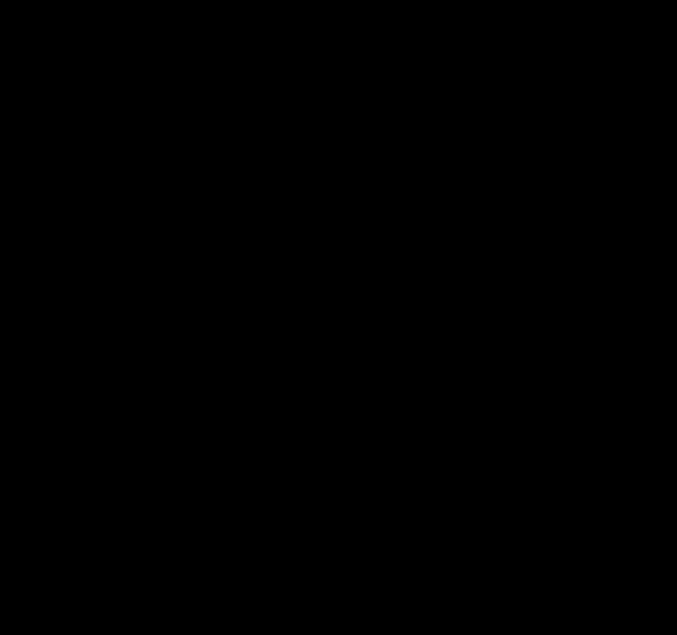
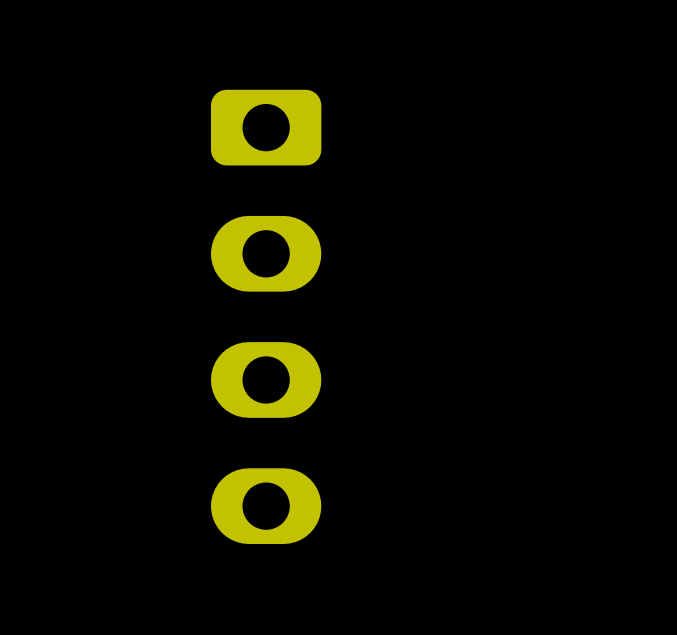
part: none -> (266, 316)

